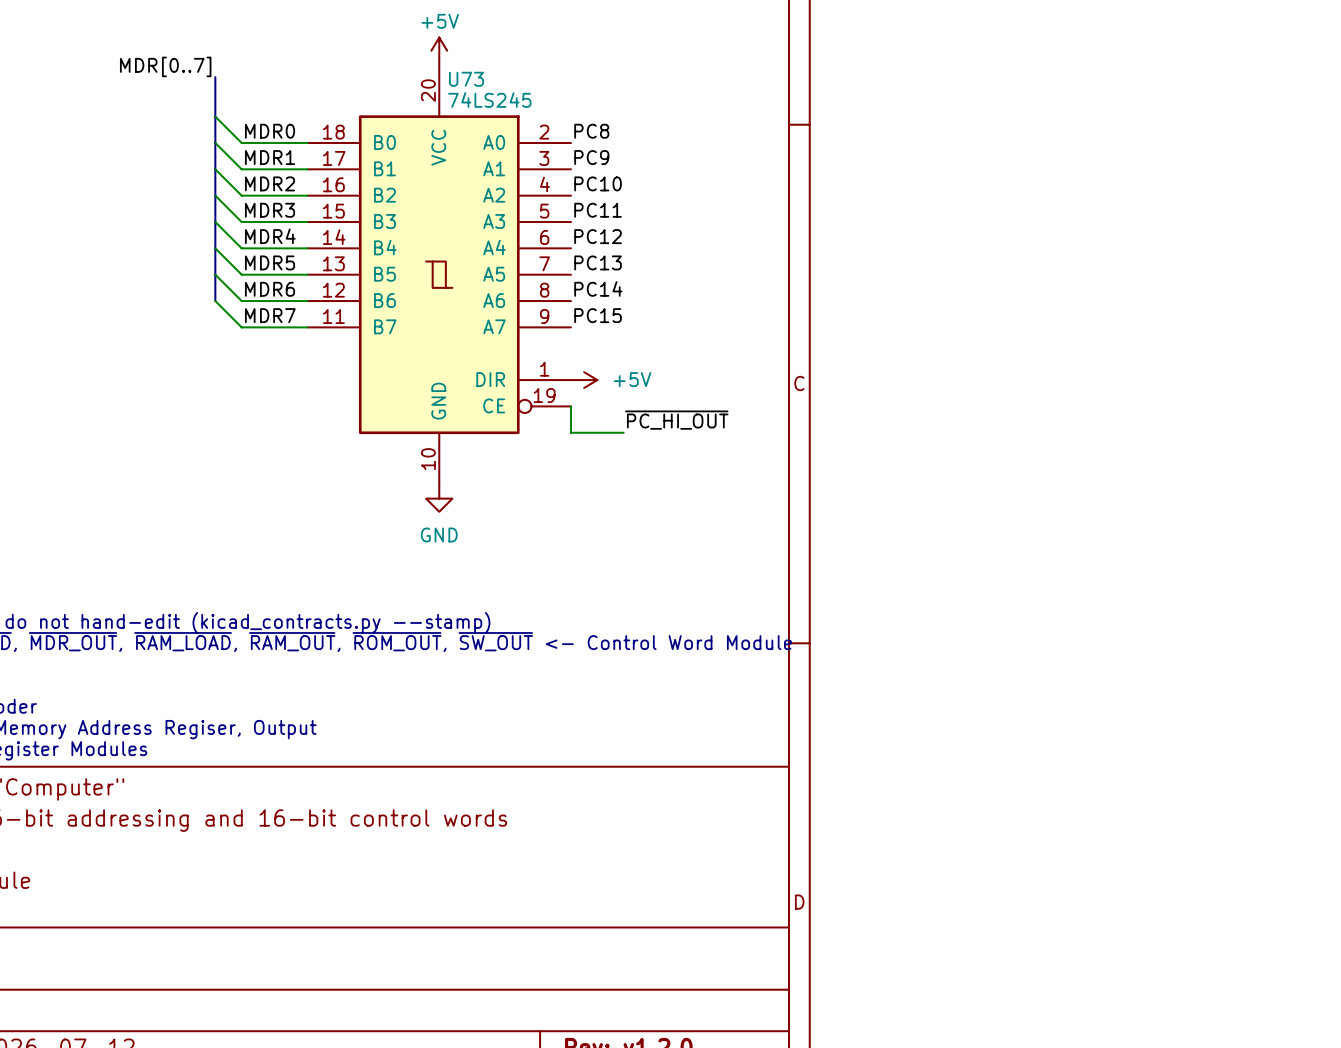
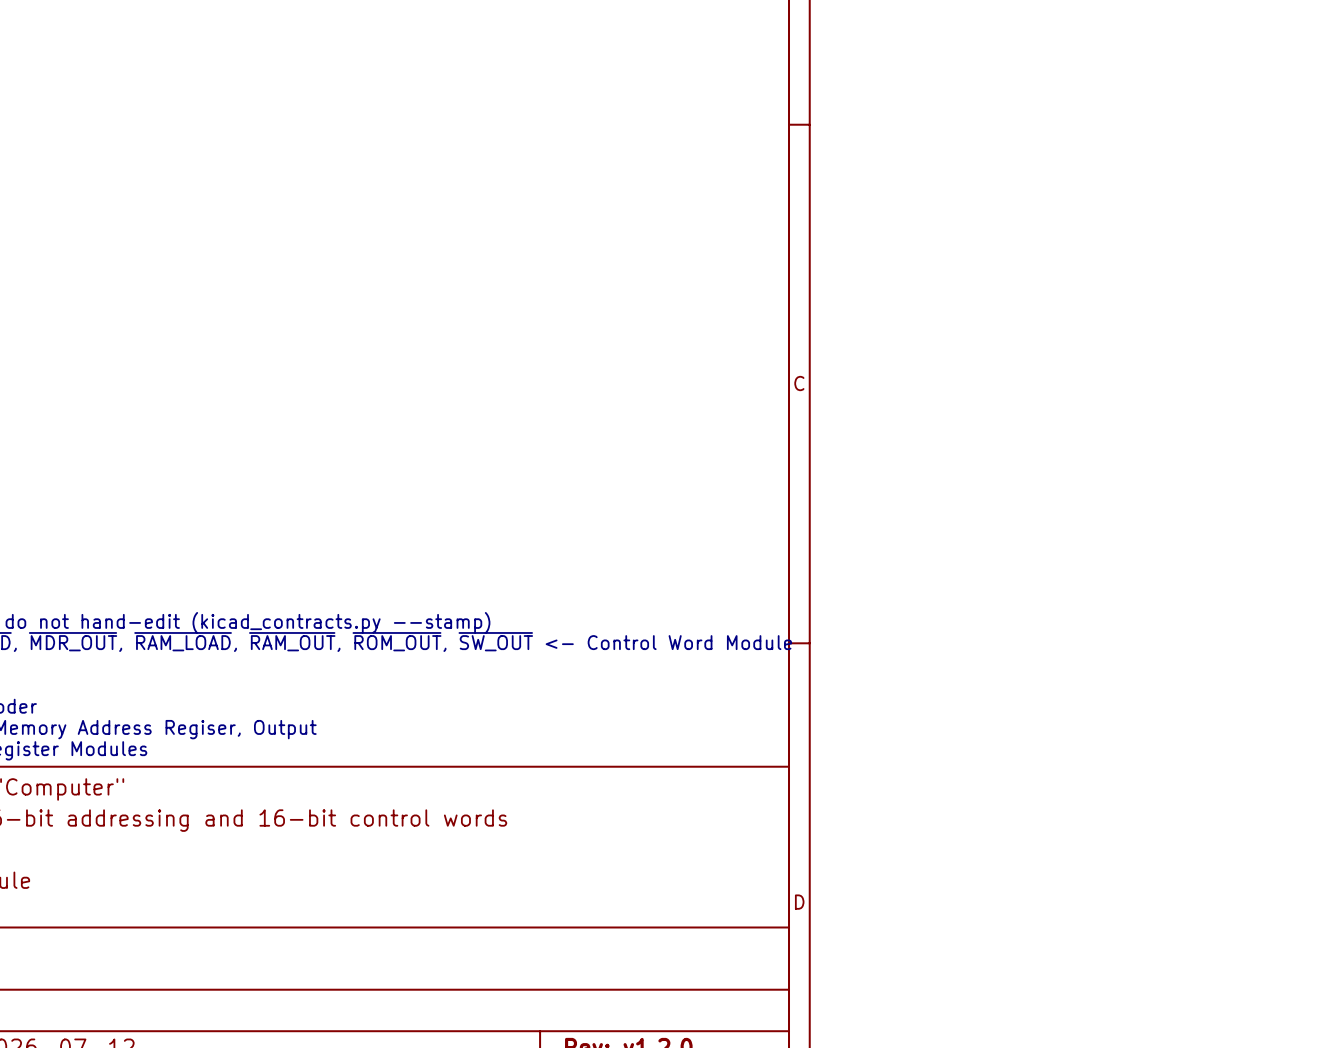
power symbol: +5V (439, 50) -> none
label: MDR[0..7] (165, 66) -> none
bus: (215, 77) (215, 301) -> none
wire: (215, 116) (241, 142) (307, 142) -> none
label: MDR0 (270, 131) -> none
label: PC8 (591, 131) -> none
wire: (215, 142) (241, 169) (307, 169) -> none
label: MDR1 (270, 157) -> none
label: PC9 (591, 157) -> none
wire: (215, 169) (241, 195) (307, 195) -> none
label: MDR2 (270, 183) -> none
label: PC10 (598, 183) -> none
wire: (215, 195) (241, 222) (307, 222) -> none
label: MDR3 (270, 210) -> none
label: PC11 (598, 210) -> none
wire: (215, 222) (241, 248) (307, 248) -> none
label: MDR4 (270, 236) -> none
label: PC12 (598, 236) -> none
wire: (215, 248) (241, 274) (307, 274) -> none
label: MDR5 (270, 262) -> none
label: PC13 (598, 262) -> none
wire: (215, 274) (241, 301) (307, 301) -> none
U73: 74LS245 (439, 274) -> none
label: PC14 (598, 288) -> none
label: MDR6 (270, 289) -> none
wire: (215, 301) (241, 327) (307, 327) -> none
label: MDR7 (270, 315) -> none
label: PC15 (598, 315) -> none
power symbol: +5V (584, 380) -> none
wire: (570, 406) (570, 432) (623, 432) -> none
label: ~{PC_HI_OUT} (676, 420) -> none
power symbol: GND (439, 498) -> none

